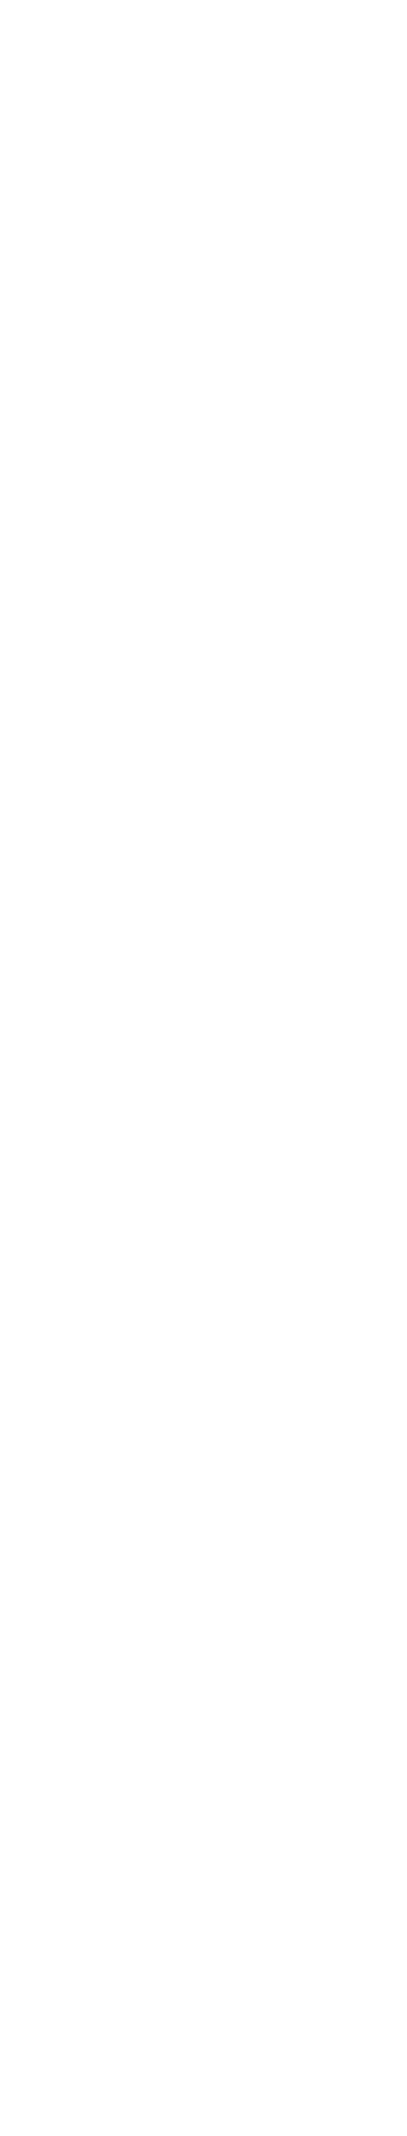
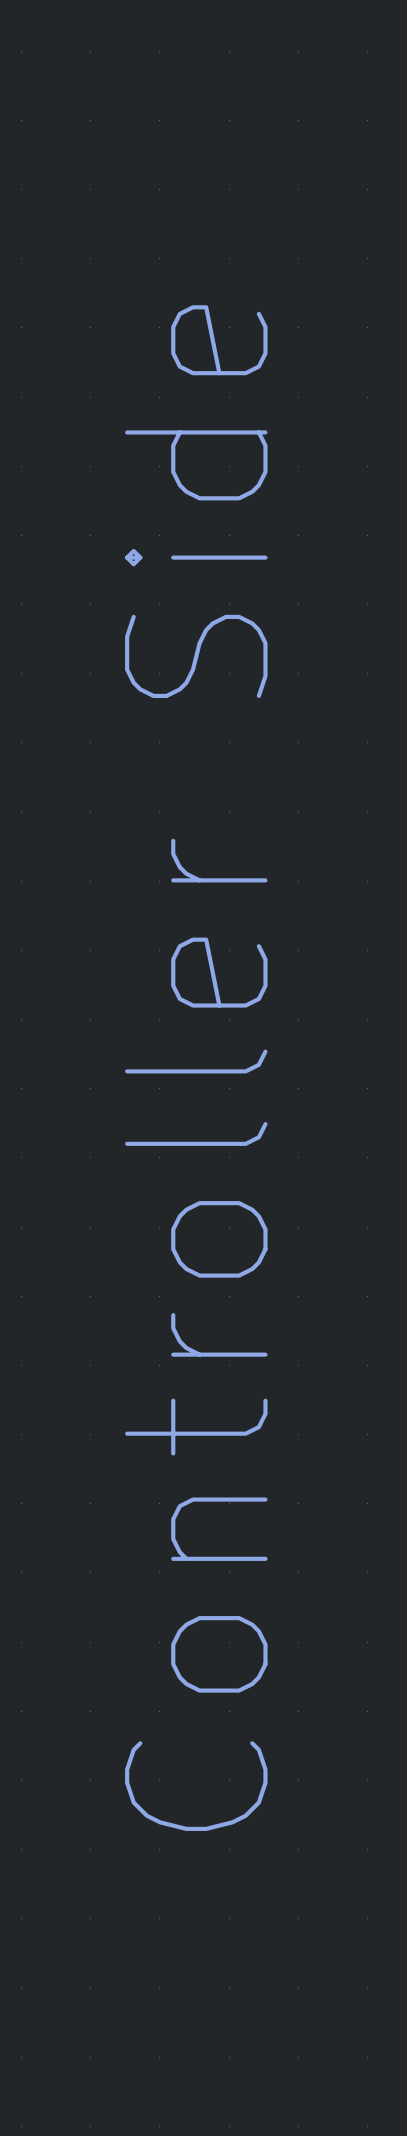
text: none -> Controller Side (196, 1068)

